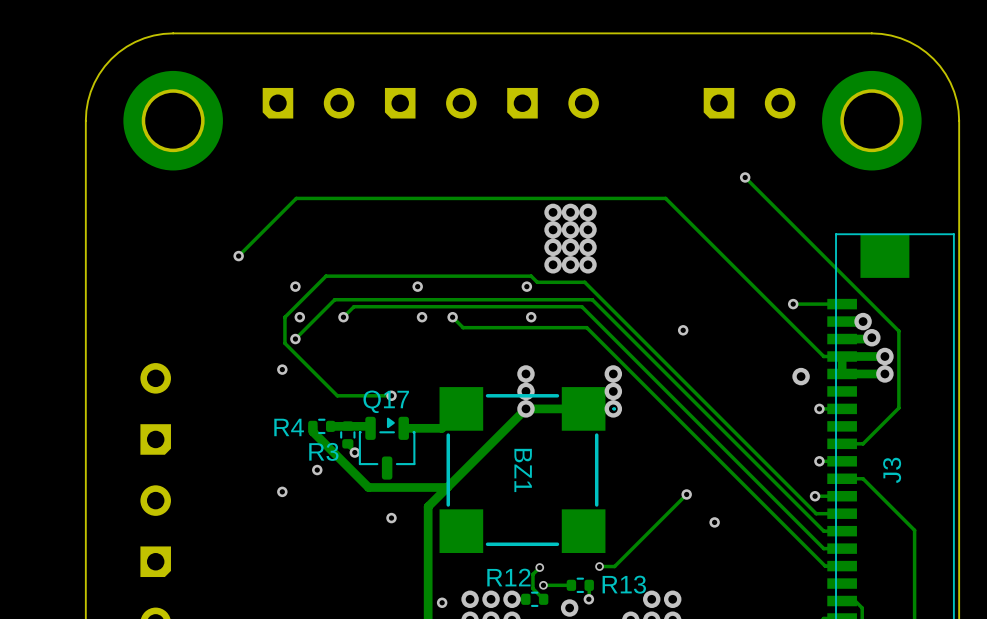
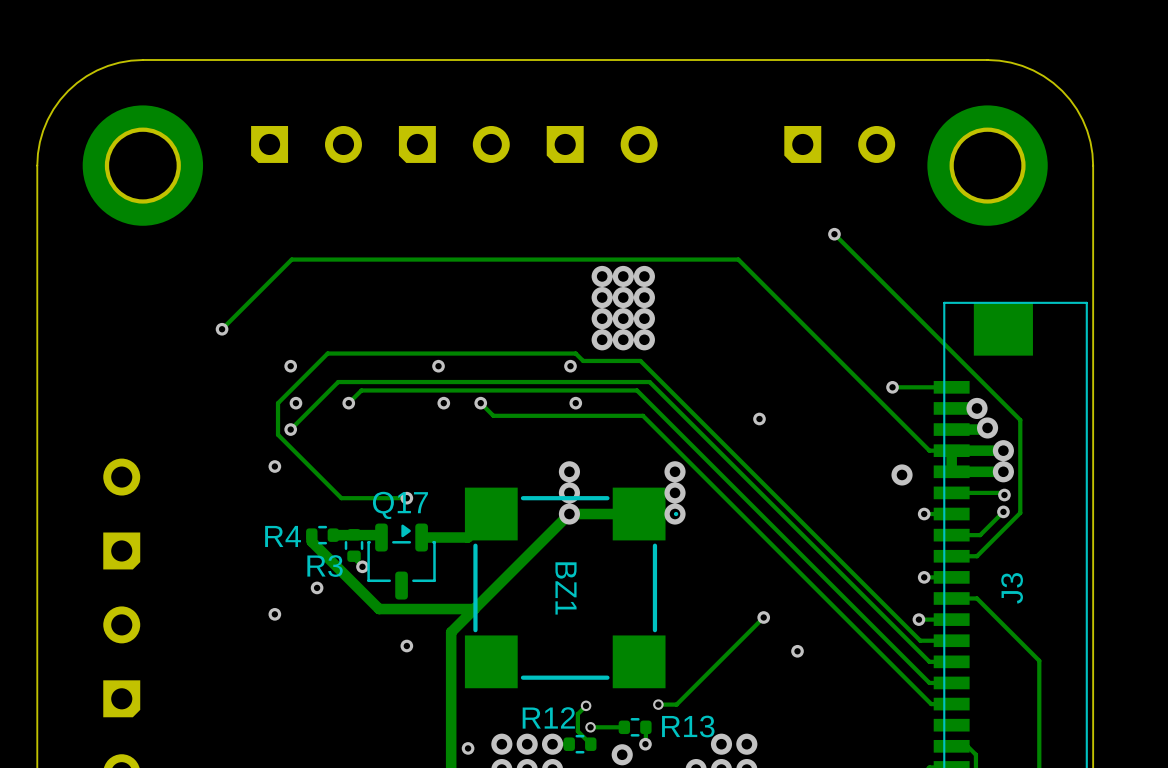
track: none -> (951, 492) (1002, 492) (1004, 495)
via: none -> (1004, 495)
track: none -> (1003, 511) (980, 535) (951, 535)
via: none -> (1003, 511)

